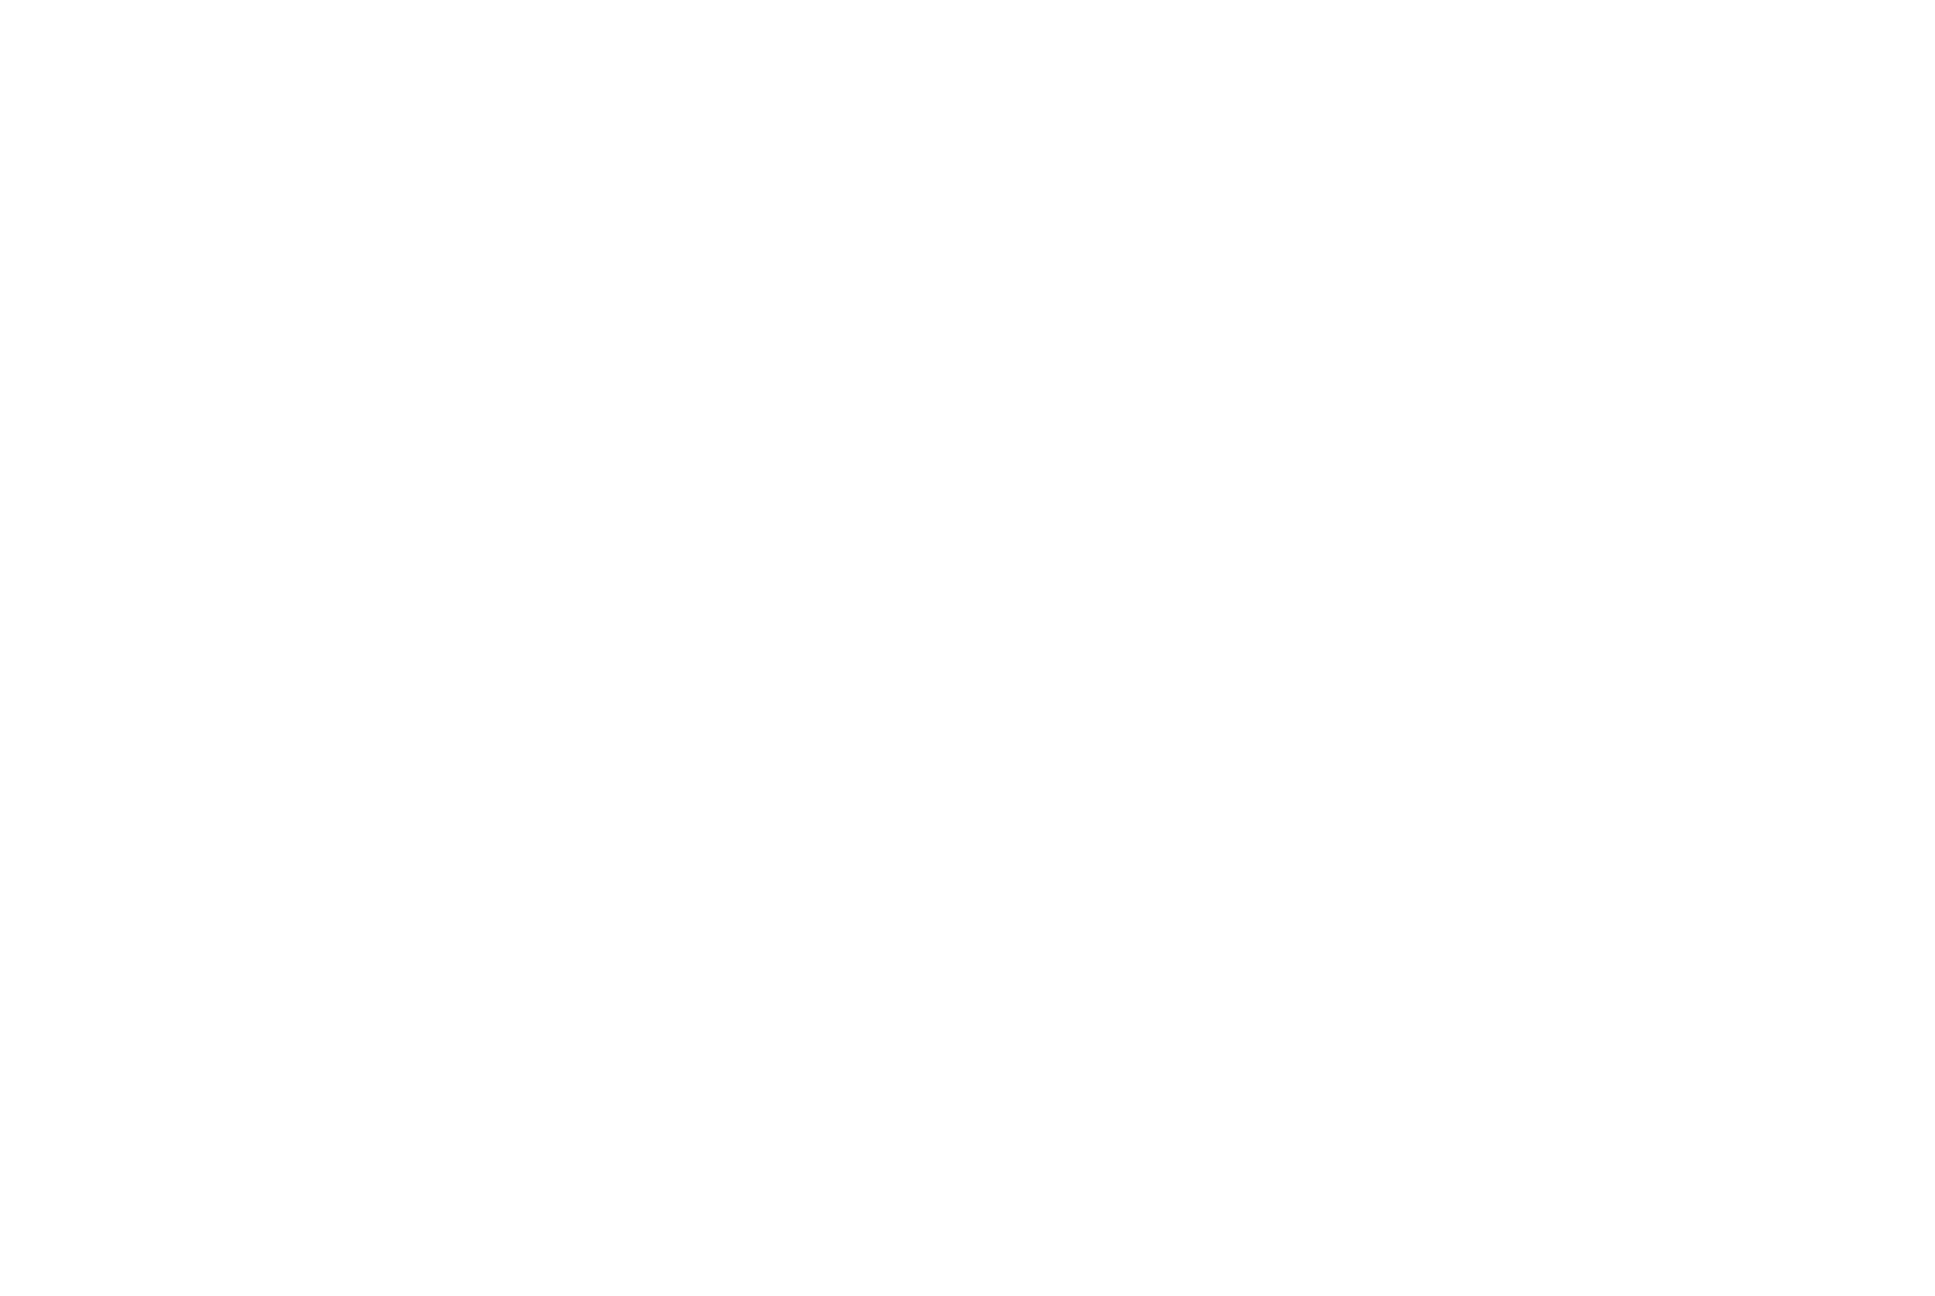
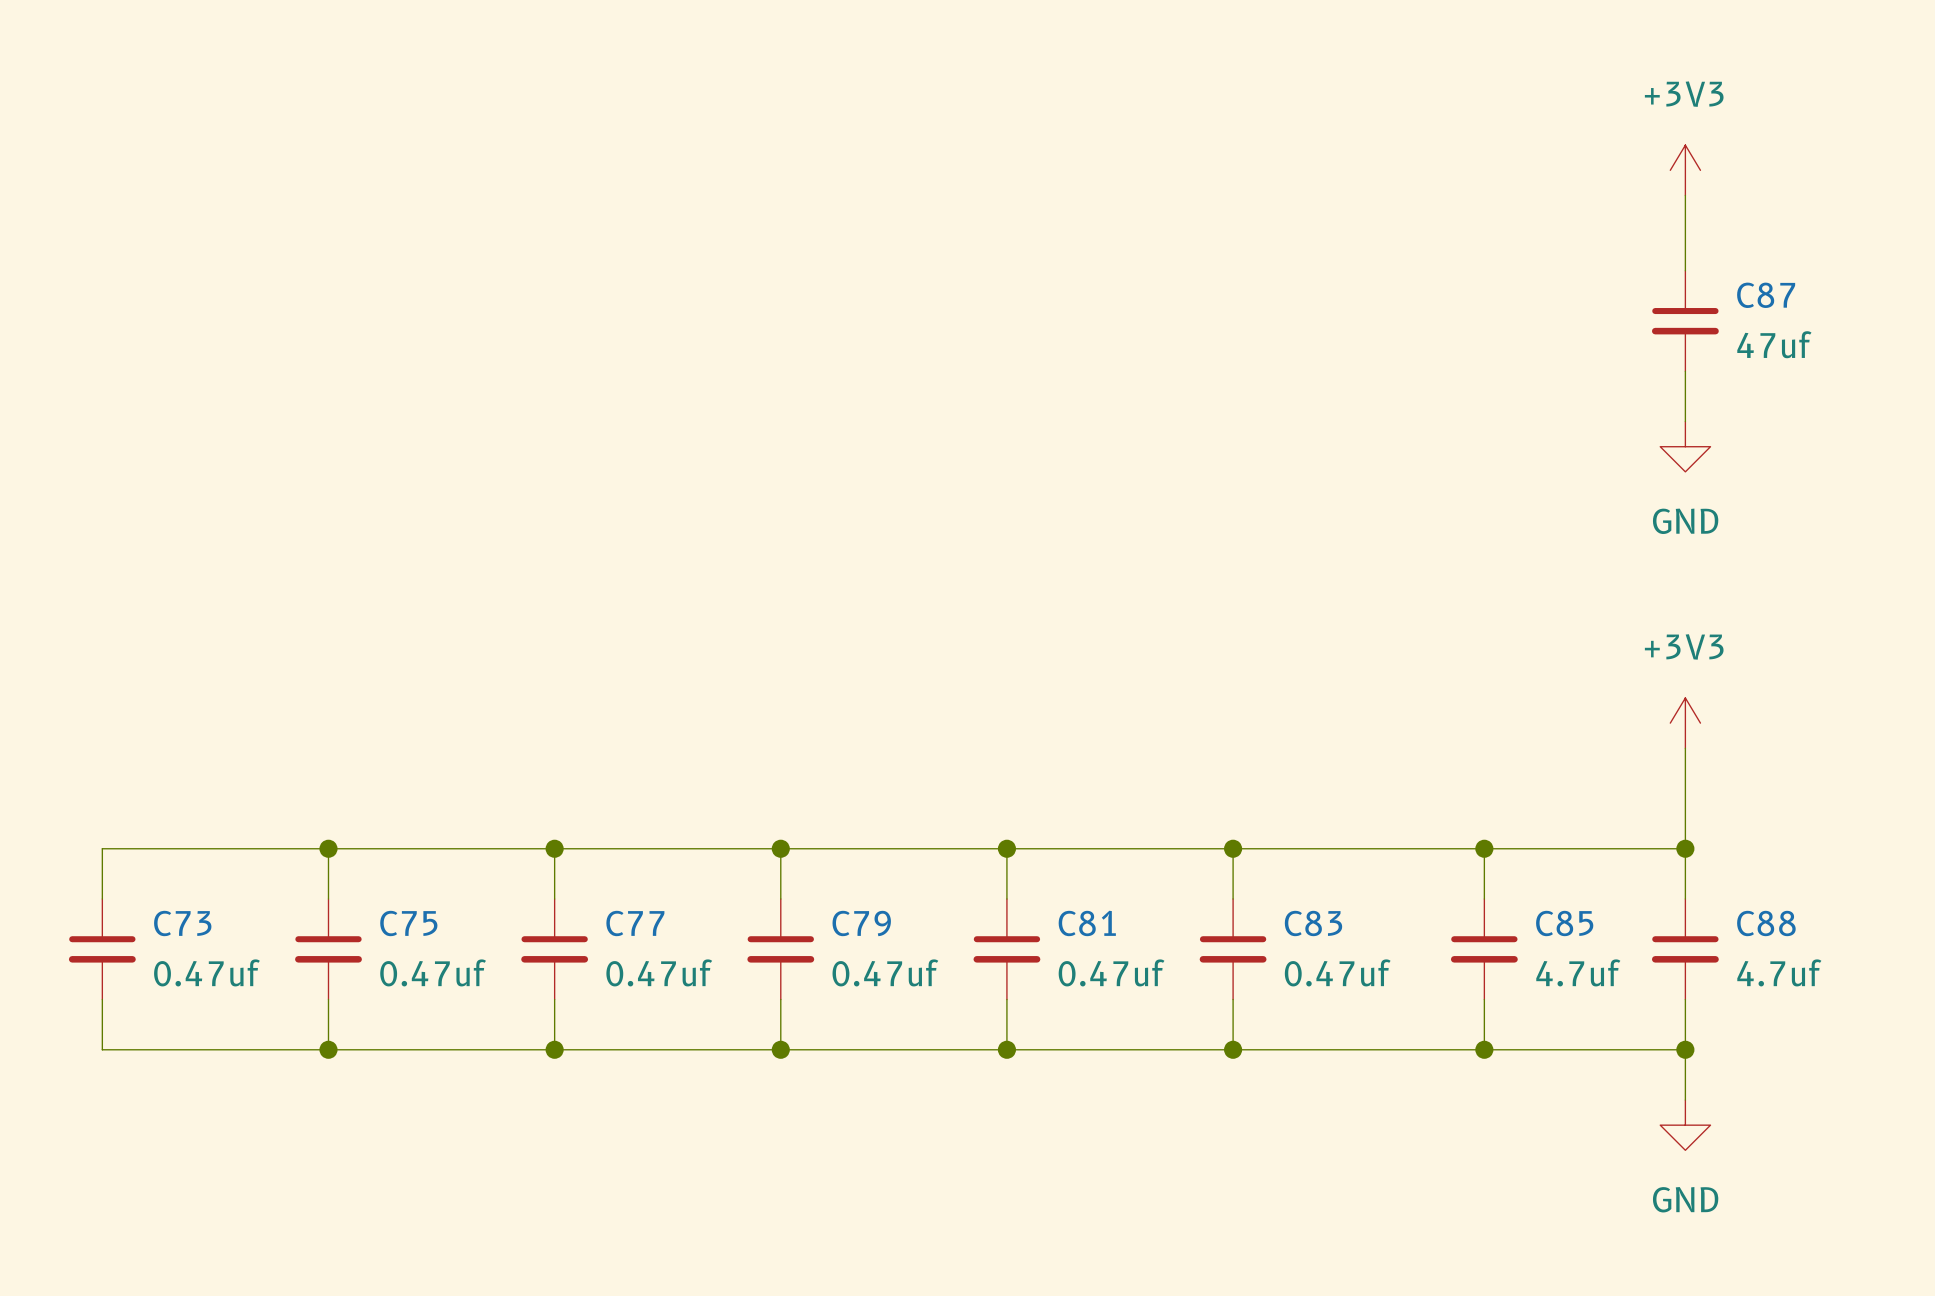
power symbol: none -> +3V3 (1685, 170)
wire: none -> (1685, 195) (1685, 270)
C87: none -> 47uf (1685, 321)
wire: none -> (1685, 371) (1685, 421)
power symbol: none -> GND (1685, 446)
power symbol: none -> +3V3 (1685, 723)
wire: none -> (1685, 748) (1685, 899)
wire: none -> (328, 848) (328, 899)
junction: none -> (328, 848)
wire: none -> (554, 848) (554, 899)
junction: none -> (554, 848)
wire: none -> (780, 848) (780, 899)
junction: none -> (780, 848)
wire: none -> (1006, 848) (1006, 899)
junction: none -> (1006, 848)
wire: none -> (1233, 848) (1233, 899)
junction: none -> (1233, 848)
wire: none -> (1484, 848) (1484, 899)
junction: none -> (1484, 848)
wire: none -> (1685, 848) (102, 848) (102, 899)
junction: none -> (1685, 848)
C73: none -> 0.47uf (102, 949)
C75: none -> 0.47uf (328, 949)
C77: none -> 0.47uf (554, 949)
C79: none -> 0.47uf (780, 949)
C81: none -> 0.47uf (1006, 949)
C83: none -> 0.47uf (1233, 949)
C85: none -> 4.7uf (1484, 949)
C88: none -> 4.7uf (1685, 949)
wire: none -> (102, 999) (102, 1049) (1685, 1049)
wire: none -> (328, 999) (328, 1049)
wire: none -> (554, 999) (554, 1049)
wire: none -> (780, 999) (780, 1049)
wire: none -> (1006, 999) (1006, 1049)
wire: none -> (1233, 999) (1233, 1049)
wire: none -> (1484, 999) (1484, 1049)
wire: none -> (1685, 999) (1685, 1100)
junction: none -> (328, 1049)
junction: none -> (554, 1049)
junction: none -> (780, 1049)
junction: none -> (1006, 1049)
junction: none -> (1233, 1049)
junction: none -> (1484, 1049)
junction: none -> (1685, 1049)
power symbol: none -> GND (1685, 1125)

